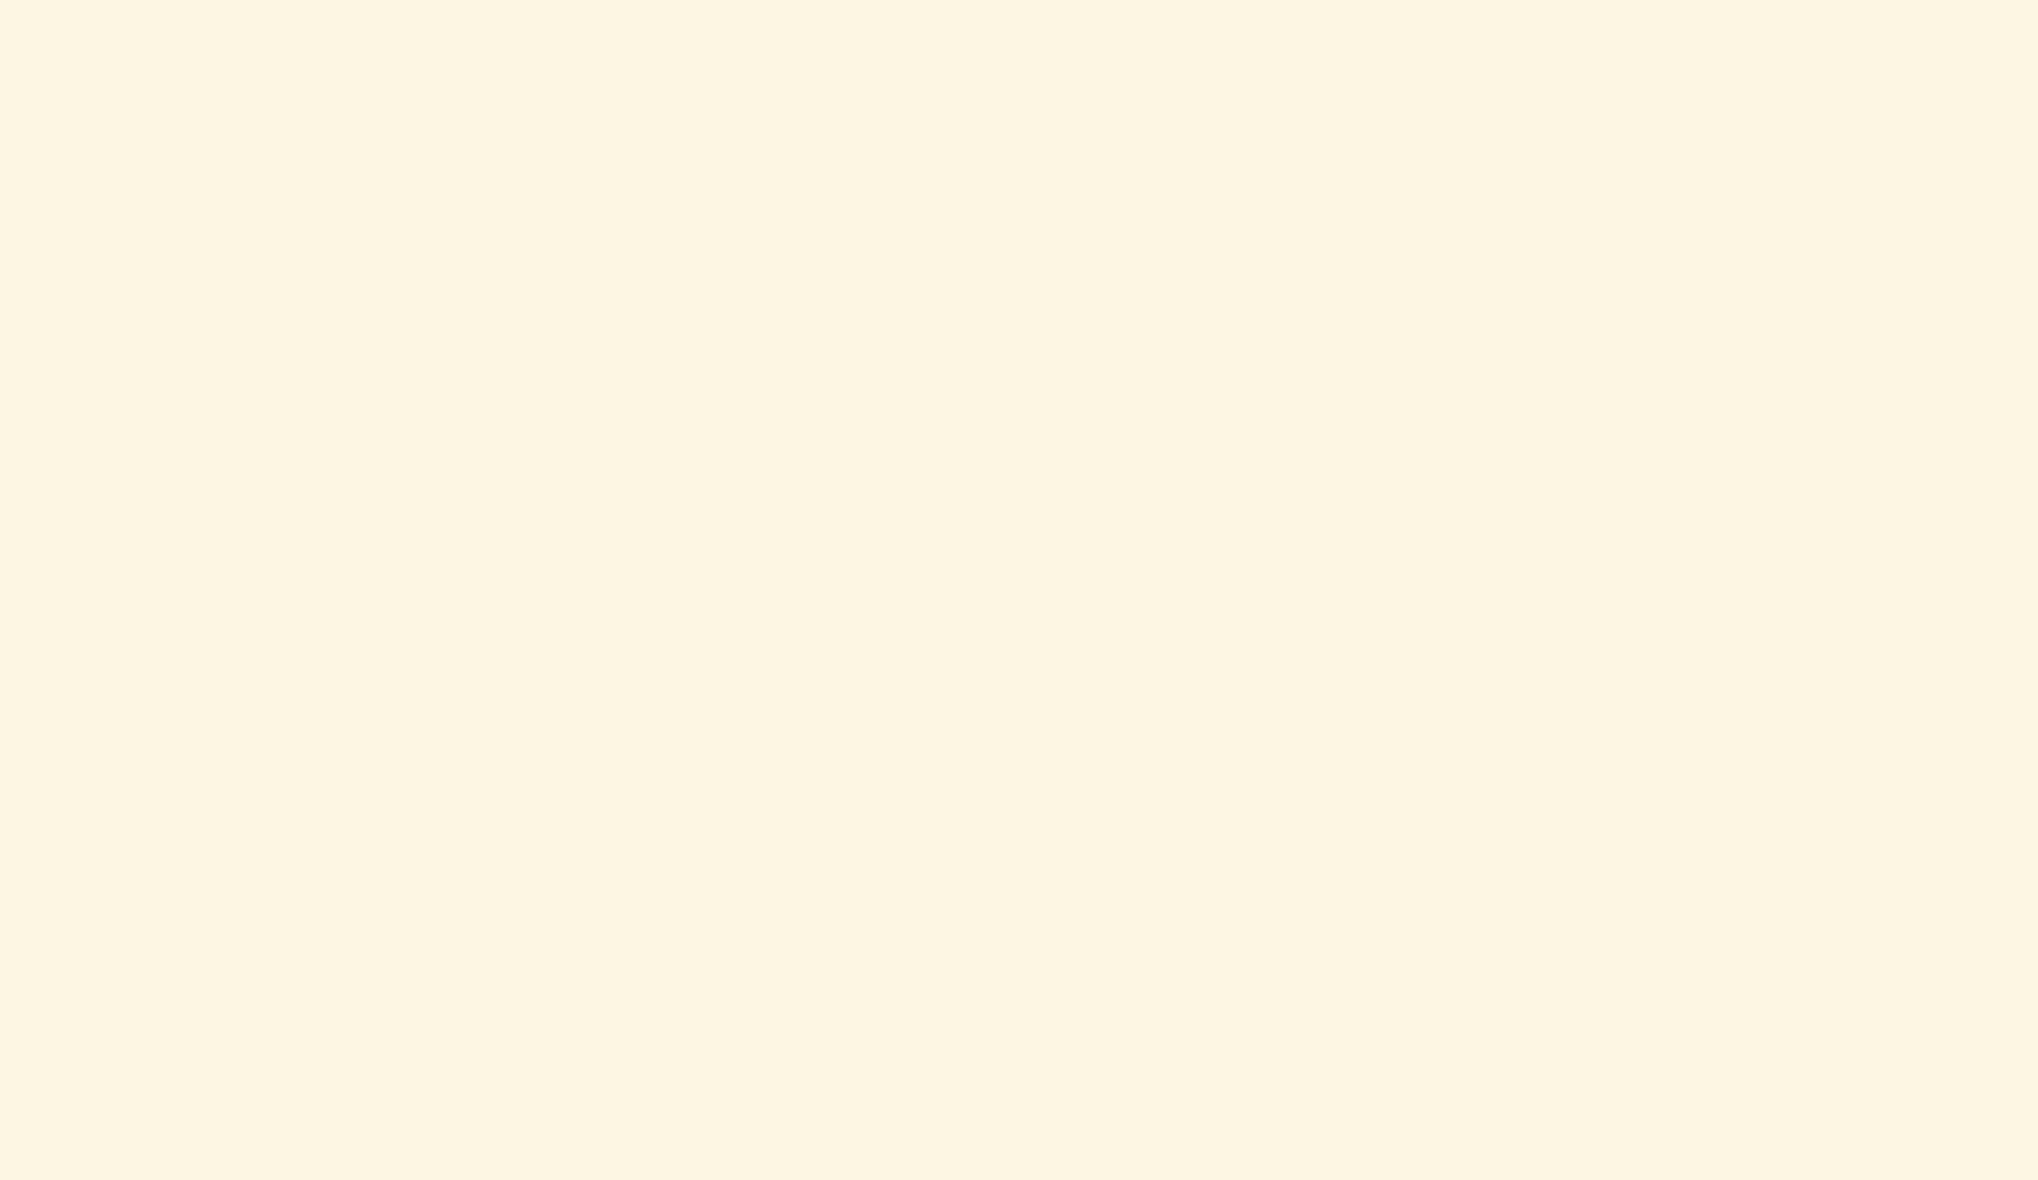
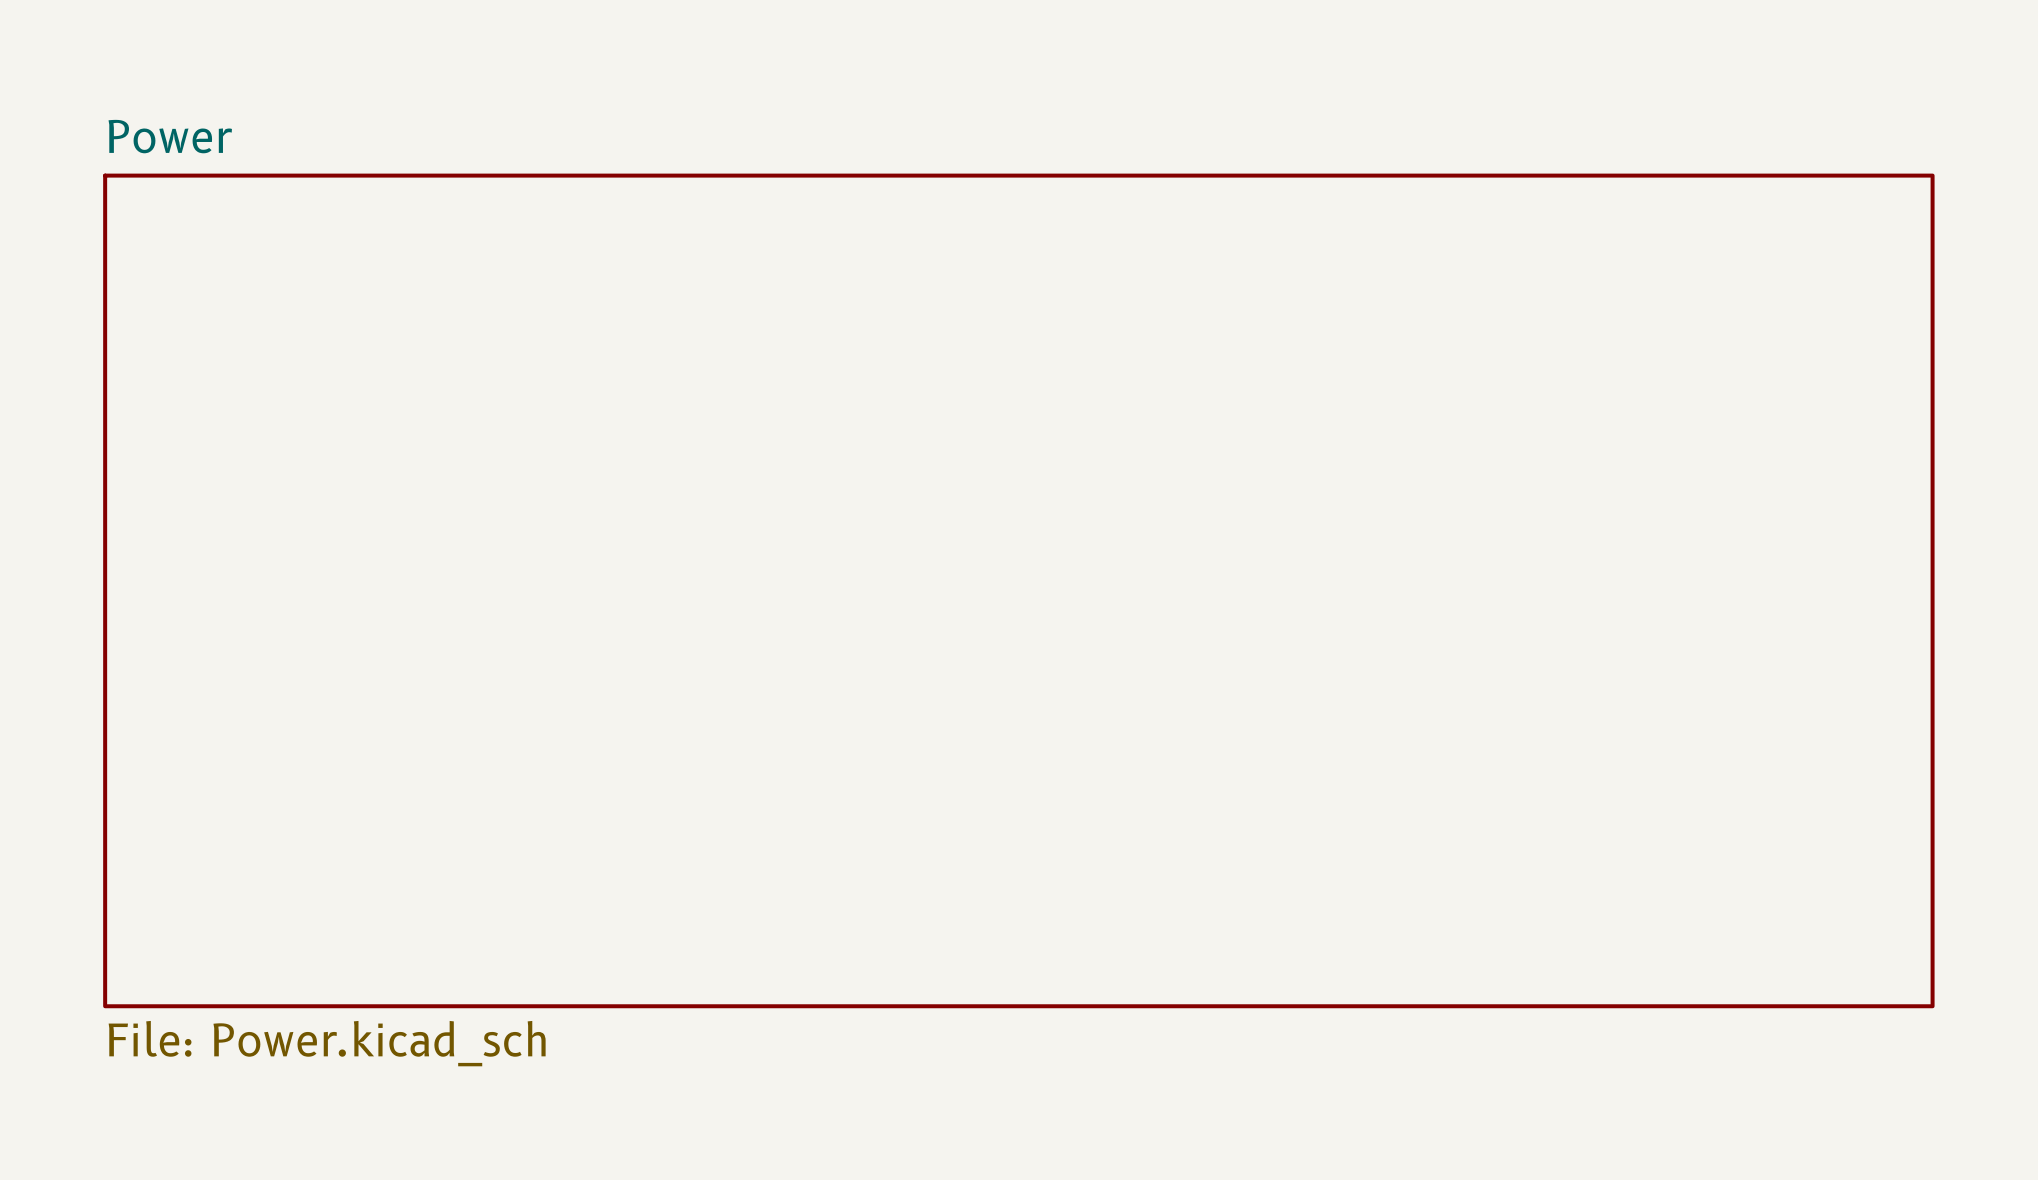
sheet Power: none -> File: Power.kicad_sch (1018, 590)

